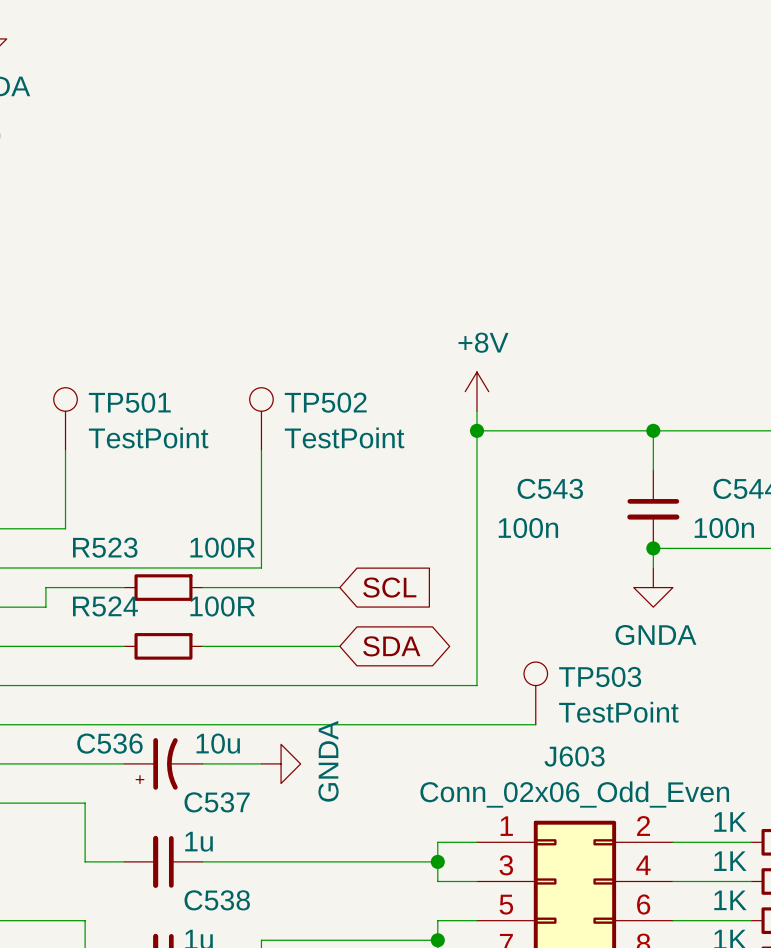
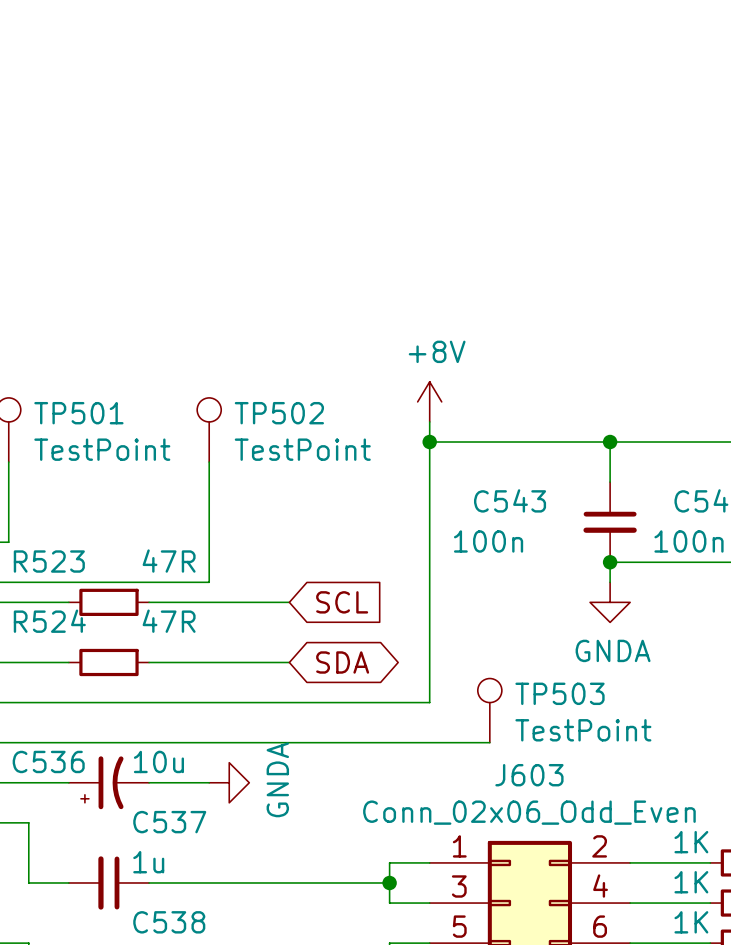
R523 value: 100R (222, 547) -> 47R (169, 561)
R524 value: 100R (222, 606) -> 47R (169, 621)

